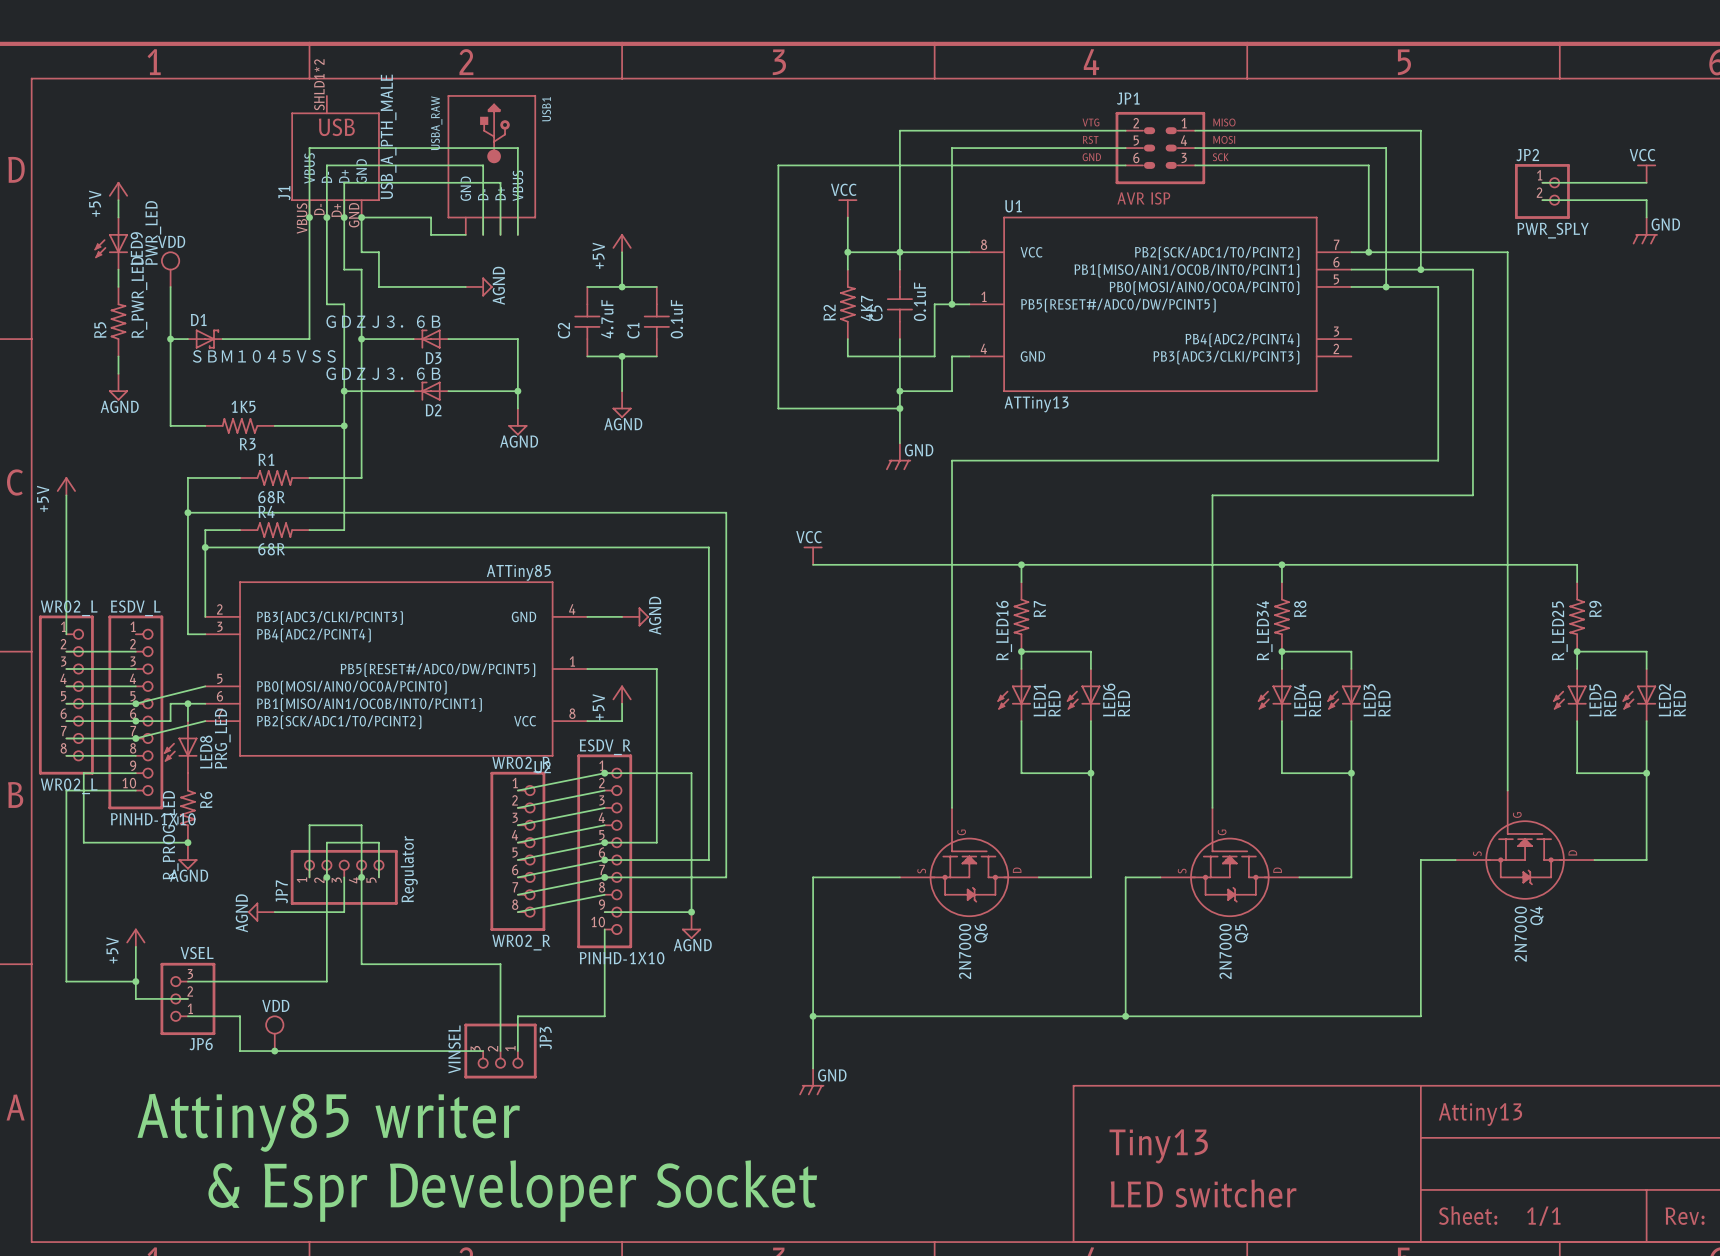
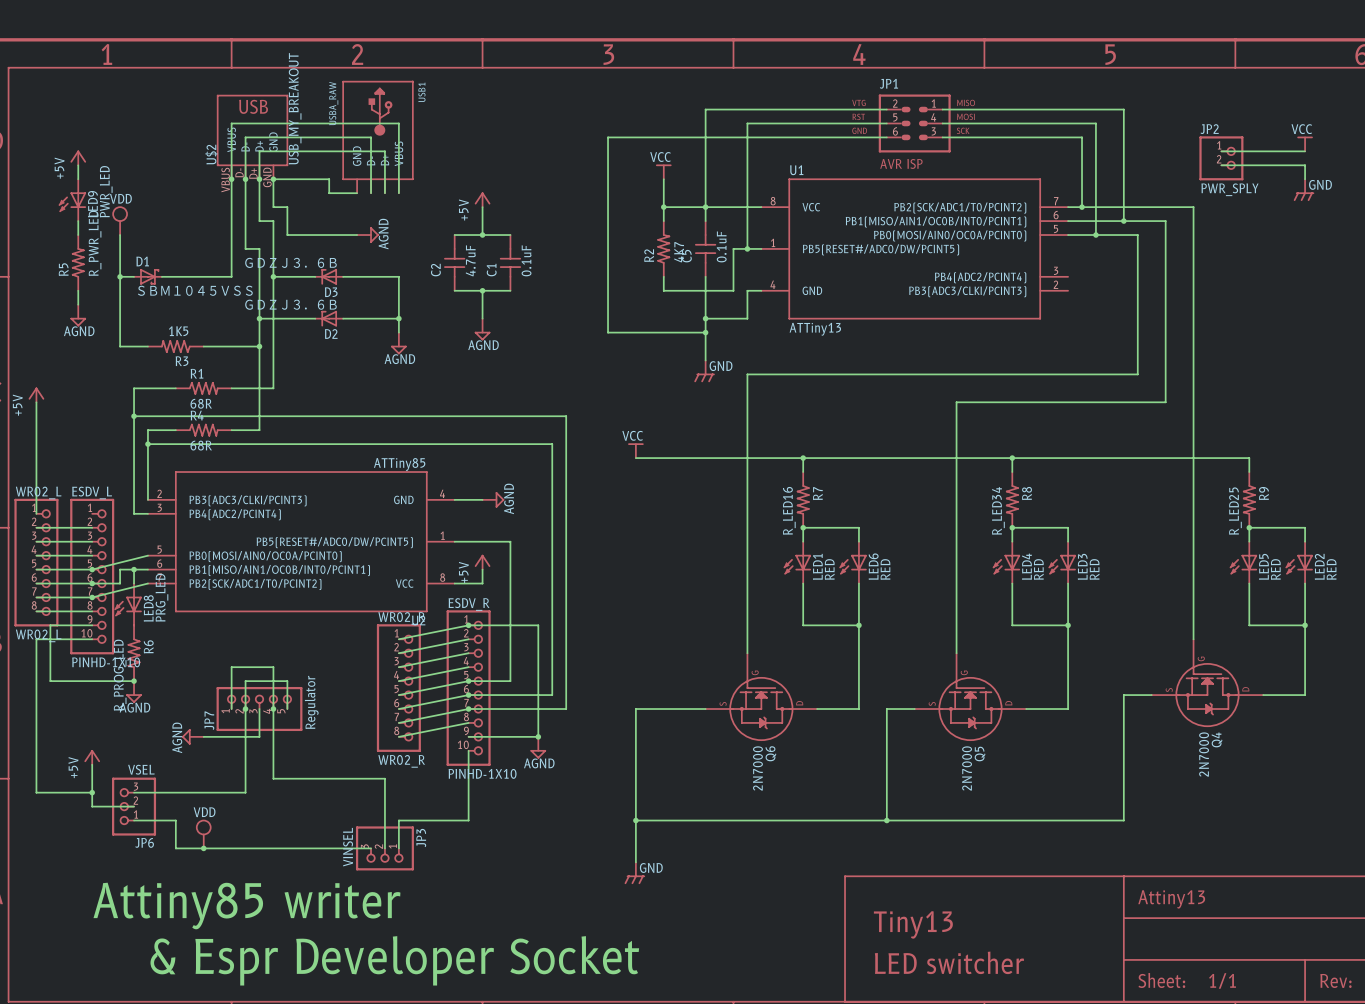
J1: USB_A_PTH_MALE (335, 156) -> none
U$2: none -> USB_MY_BREAKOUT (252, 137)

